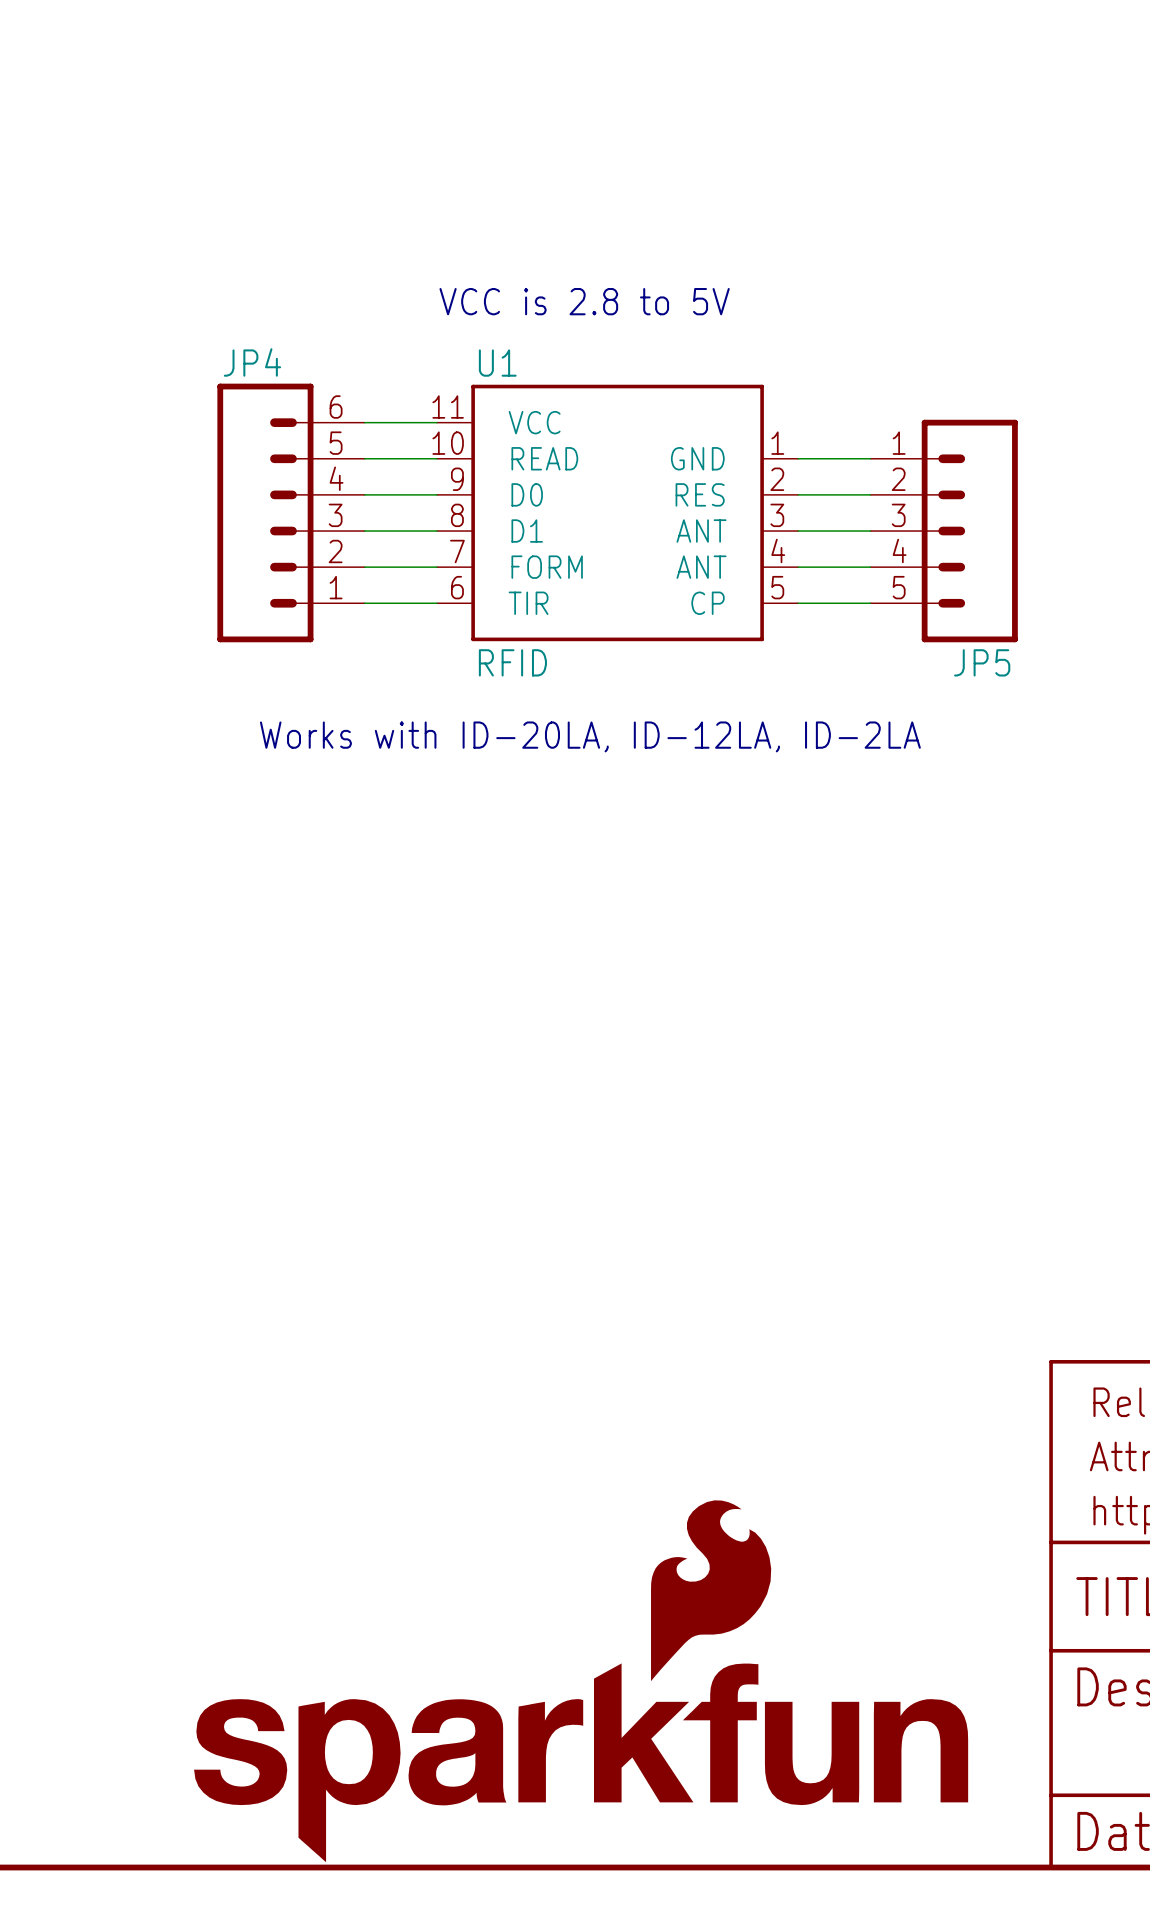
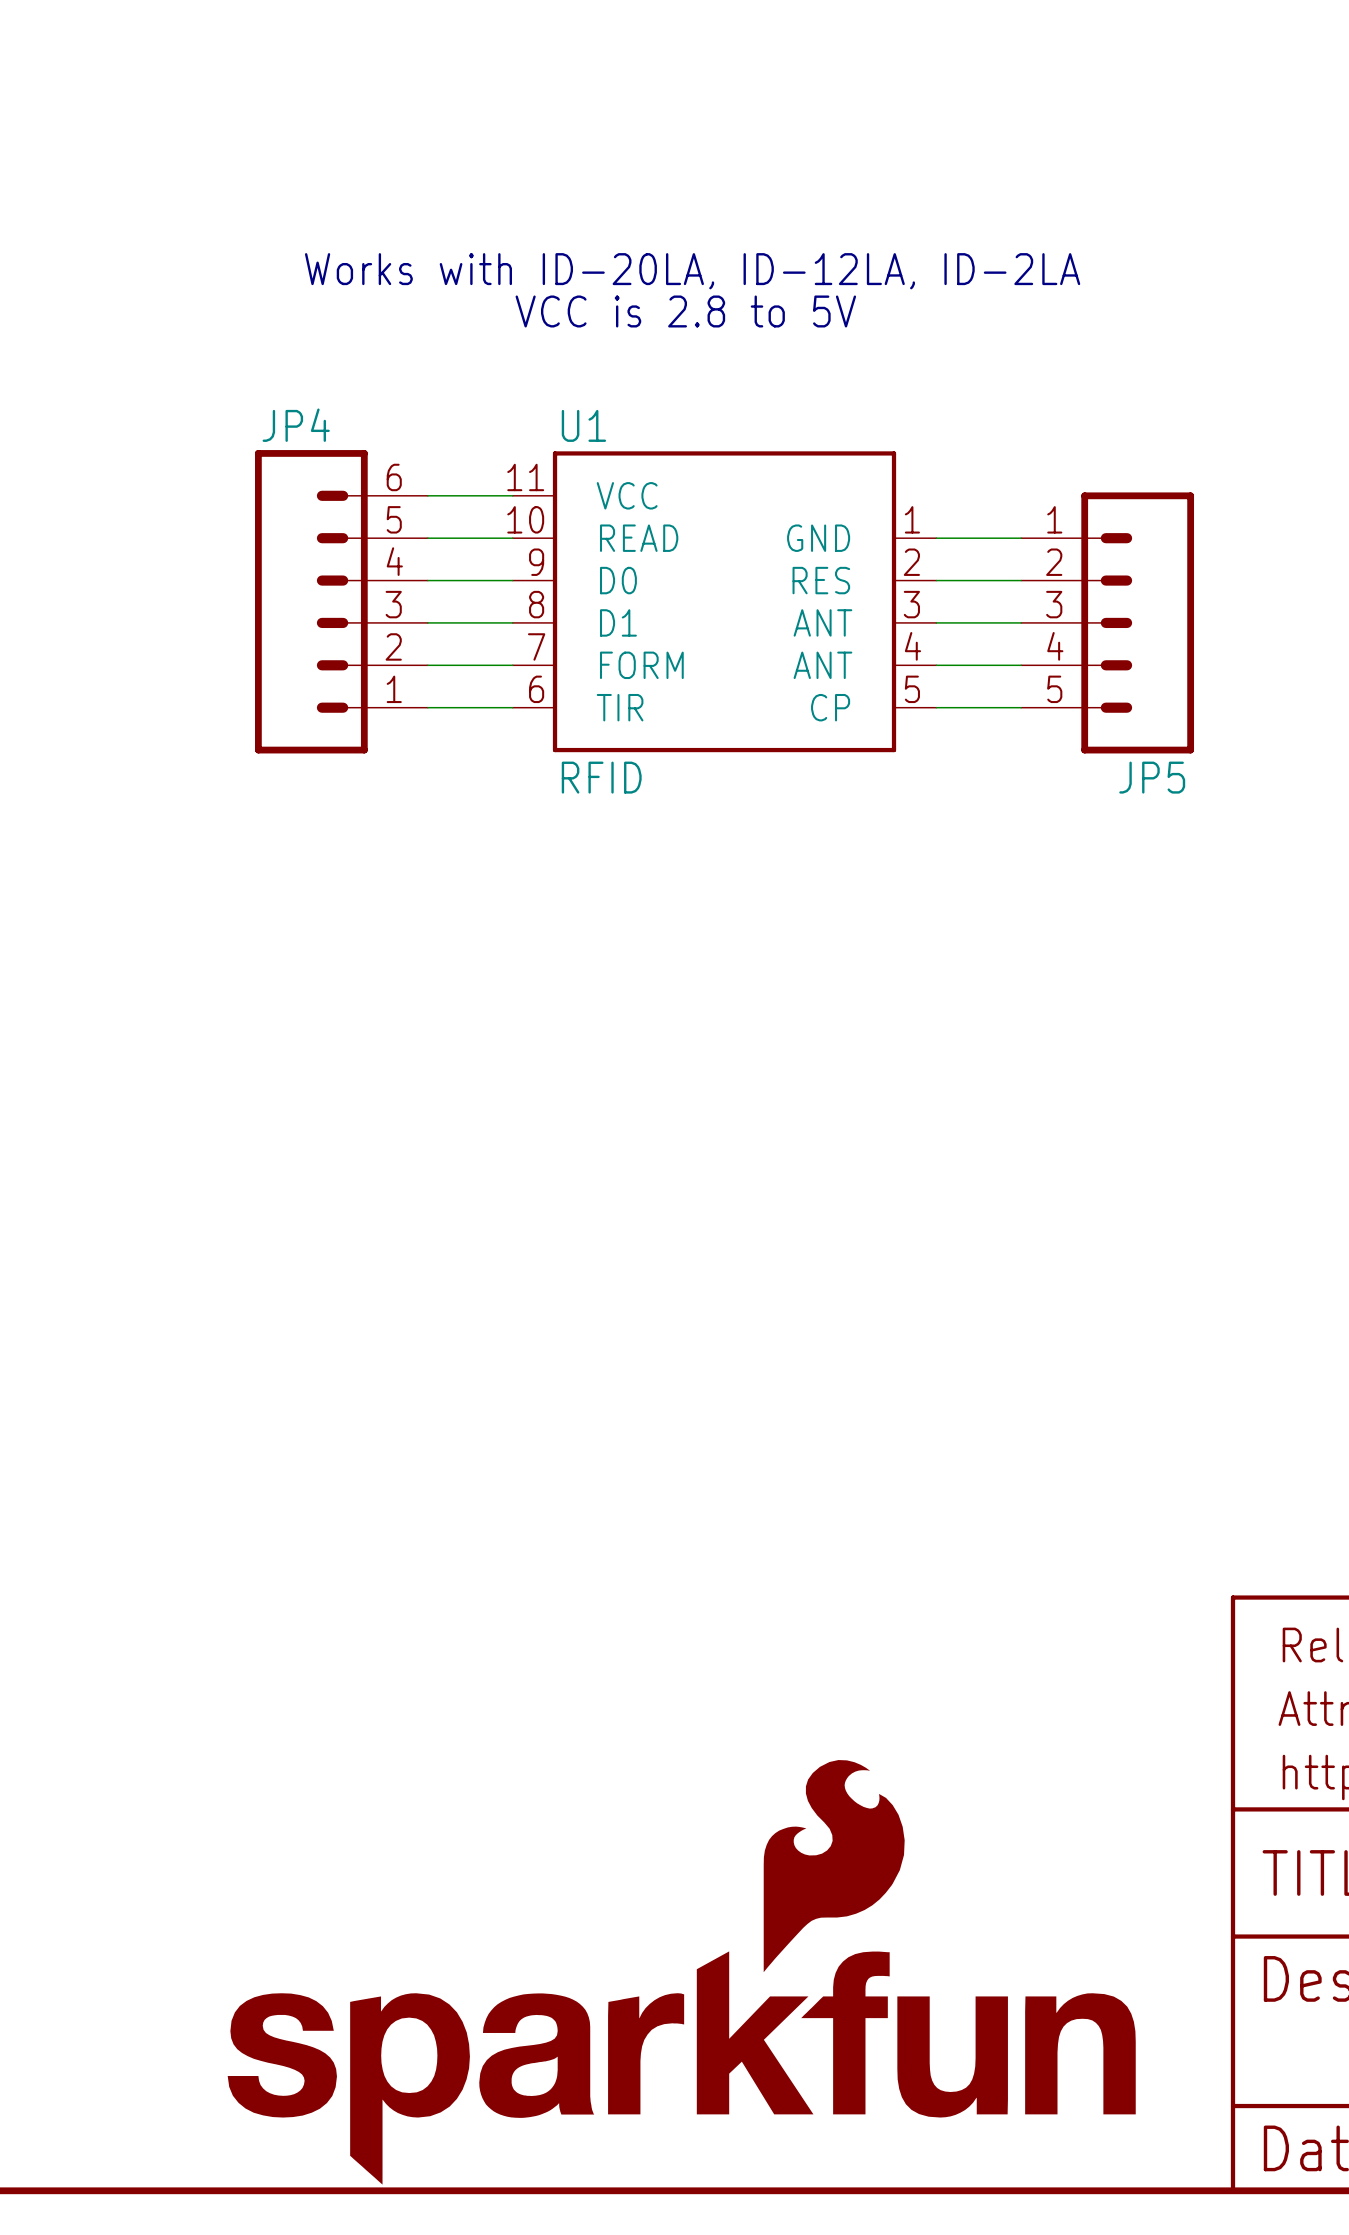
text: none -> Works with ID-20LA, ID-12LA, ID-2LA (692, 271)
text position: VCC is 2.8 to 5V (584, 301) -> VCC is 2.8 to 5V (685, 311)
text: Works with ID-20LA, ID-12LA, ID-2LA (590, 736) -> none

